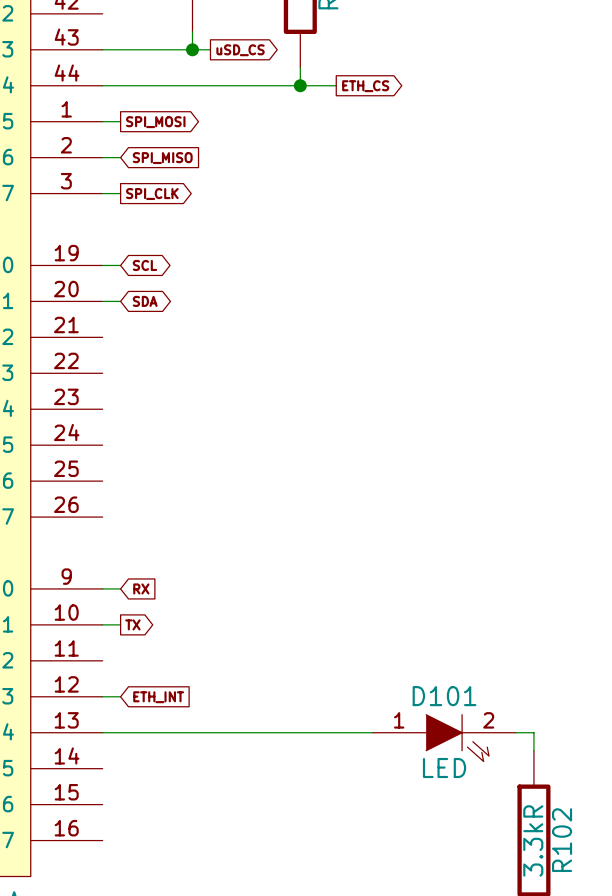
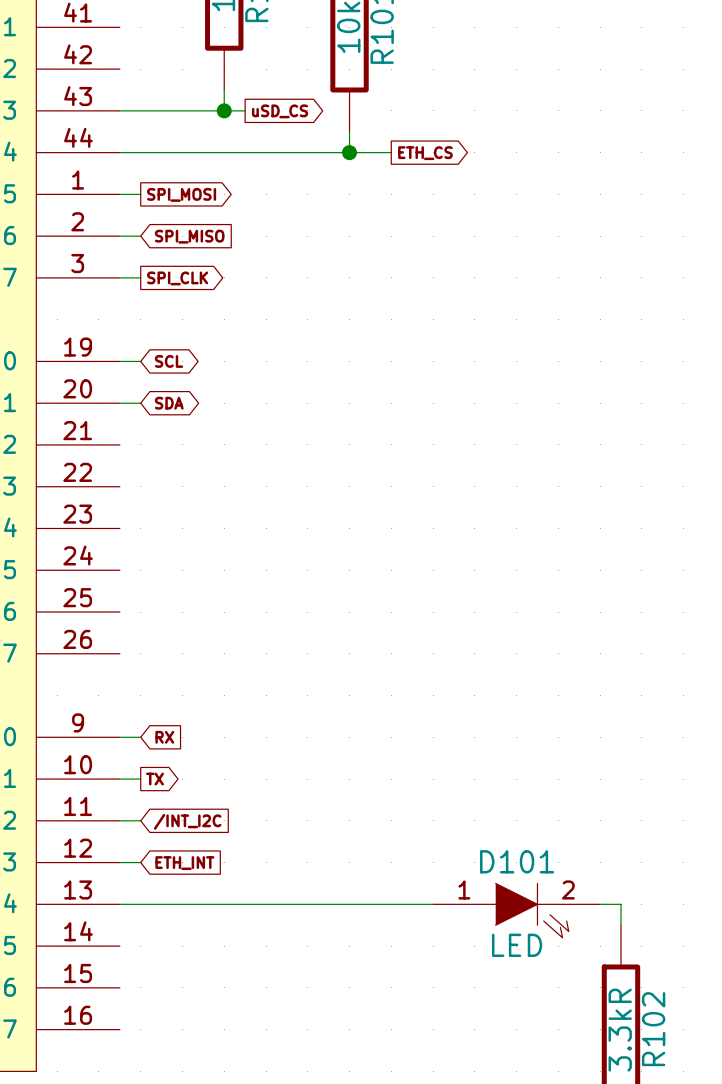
wire: none -> (119, 820) (140, 820)
global label: none -> /INT_I2C (187, 821)

